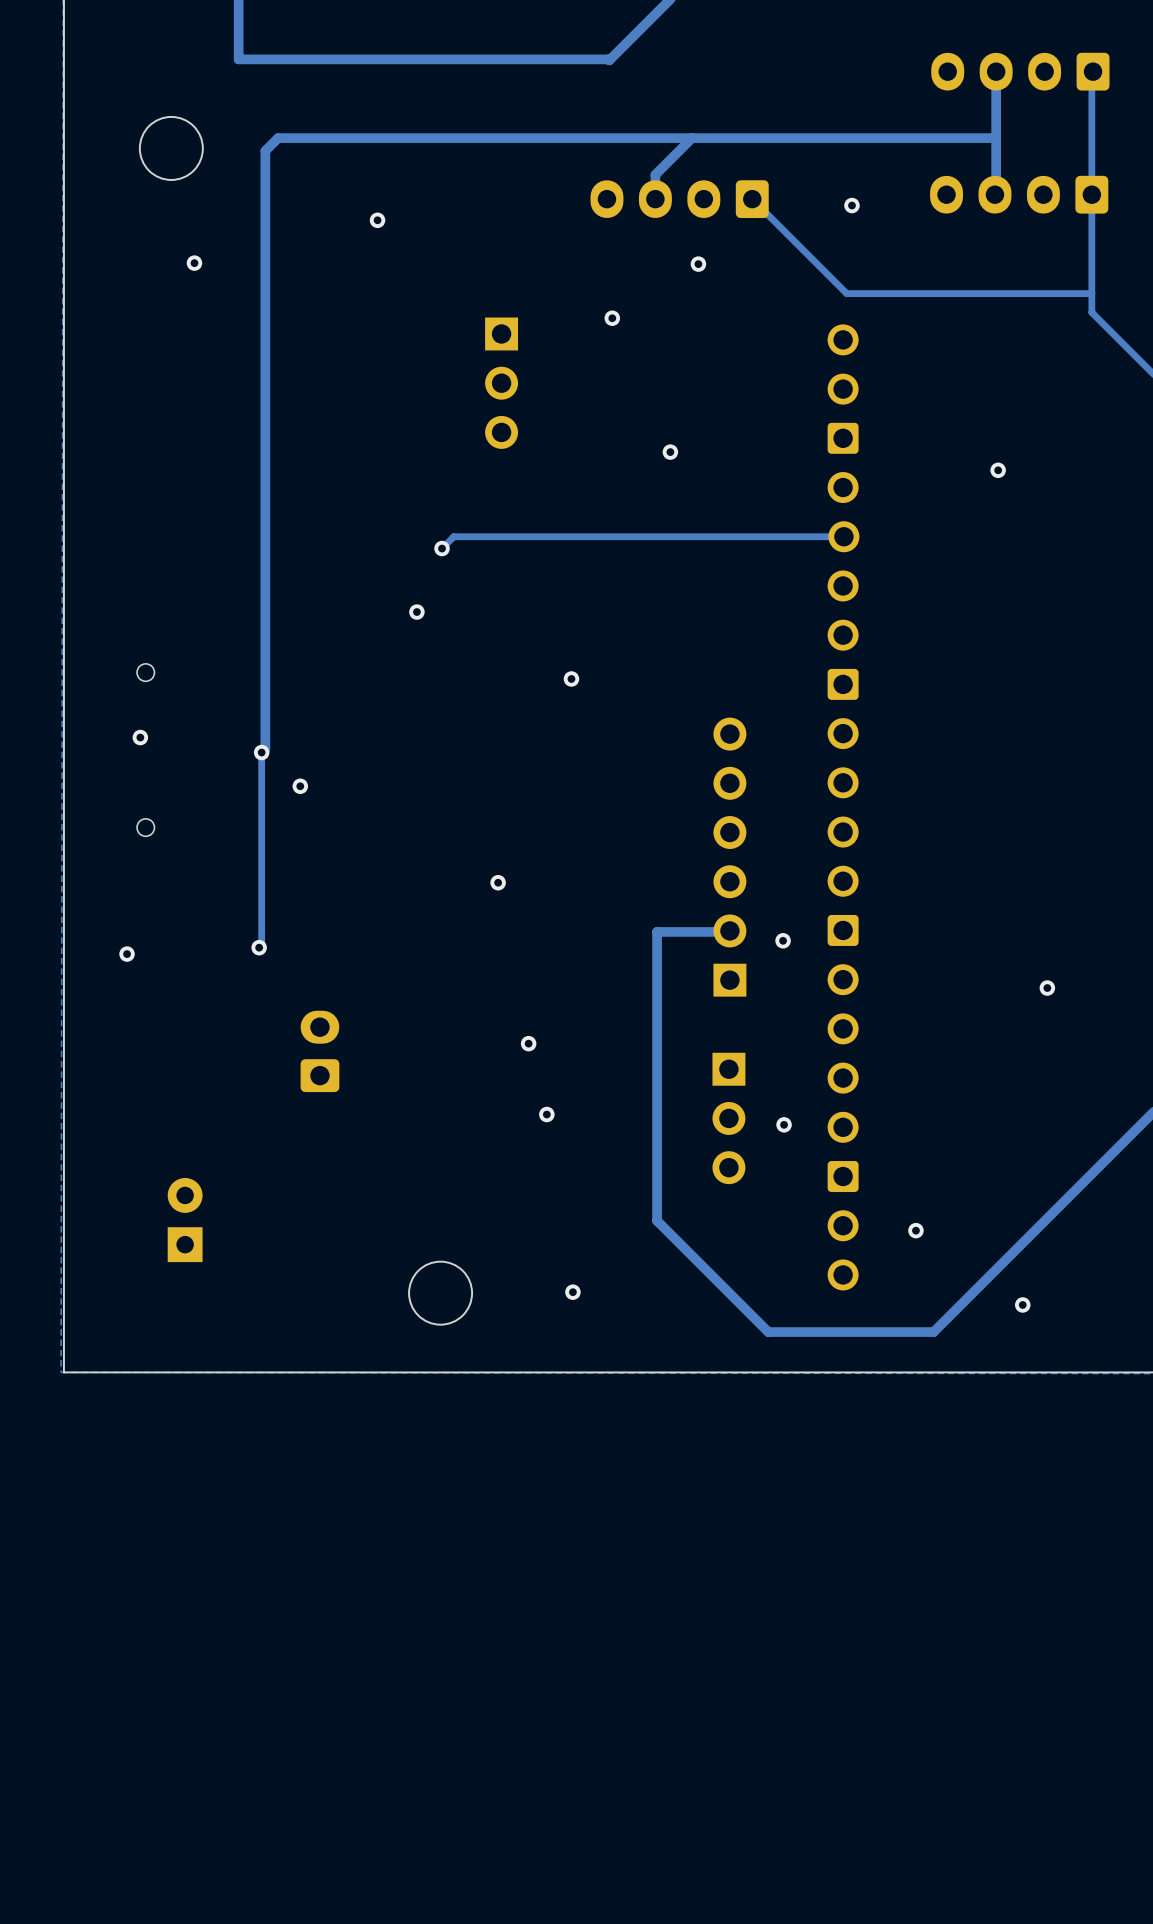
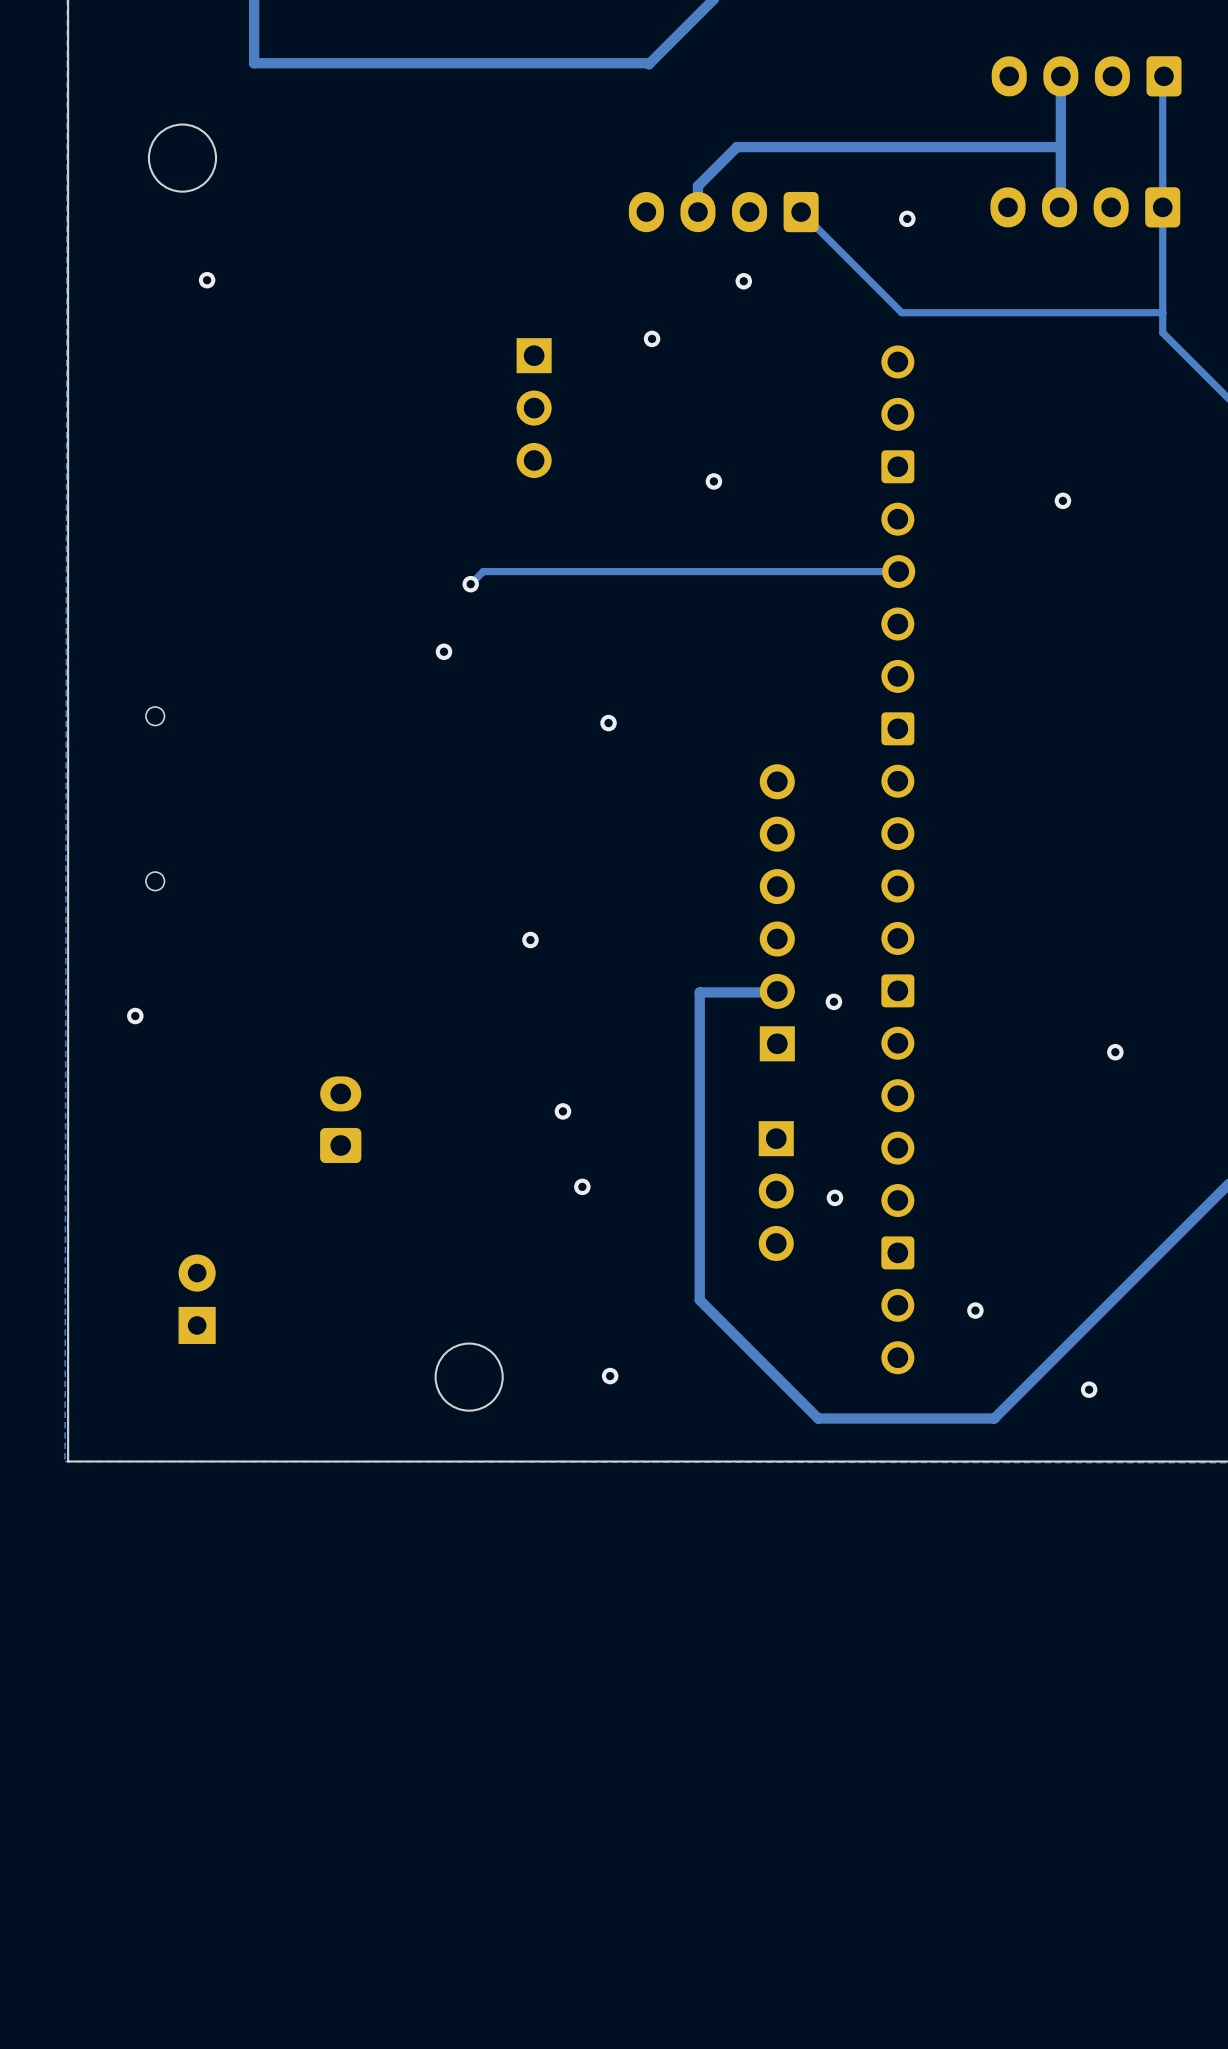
track: (692, 138) (278, 138) (265, 150) (265, 748) (261, 752) (261, 945) (259, 947) -> none
via: (377, 220) -> none
via: (140, 737) -> none
via: (261, 752) -> none
via: (300, 786) -> none
via: (259, 947) -> none

